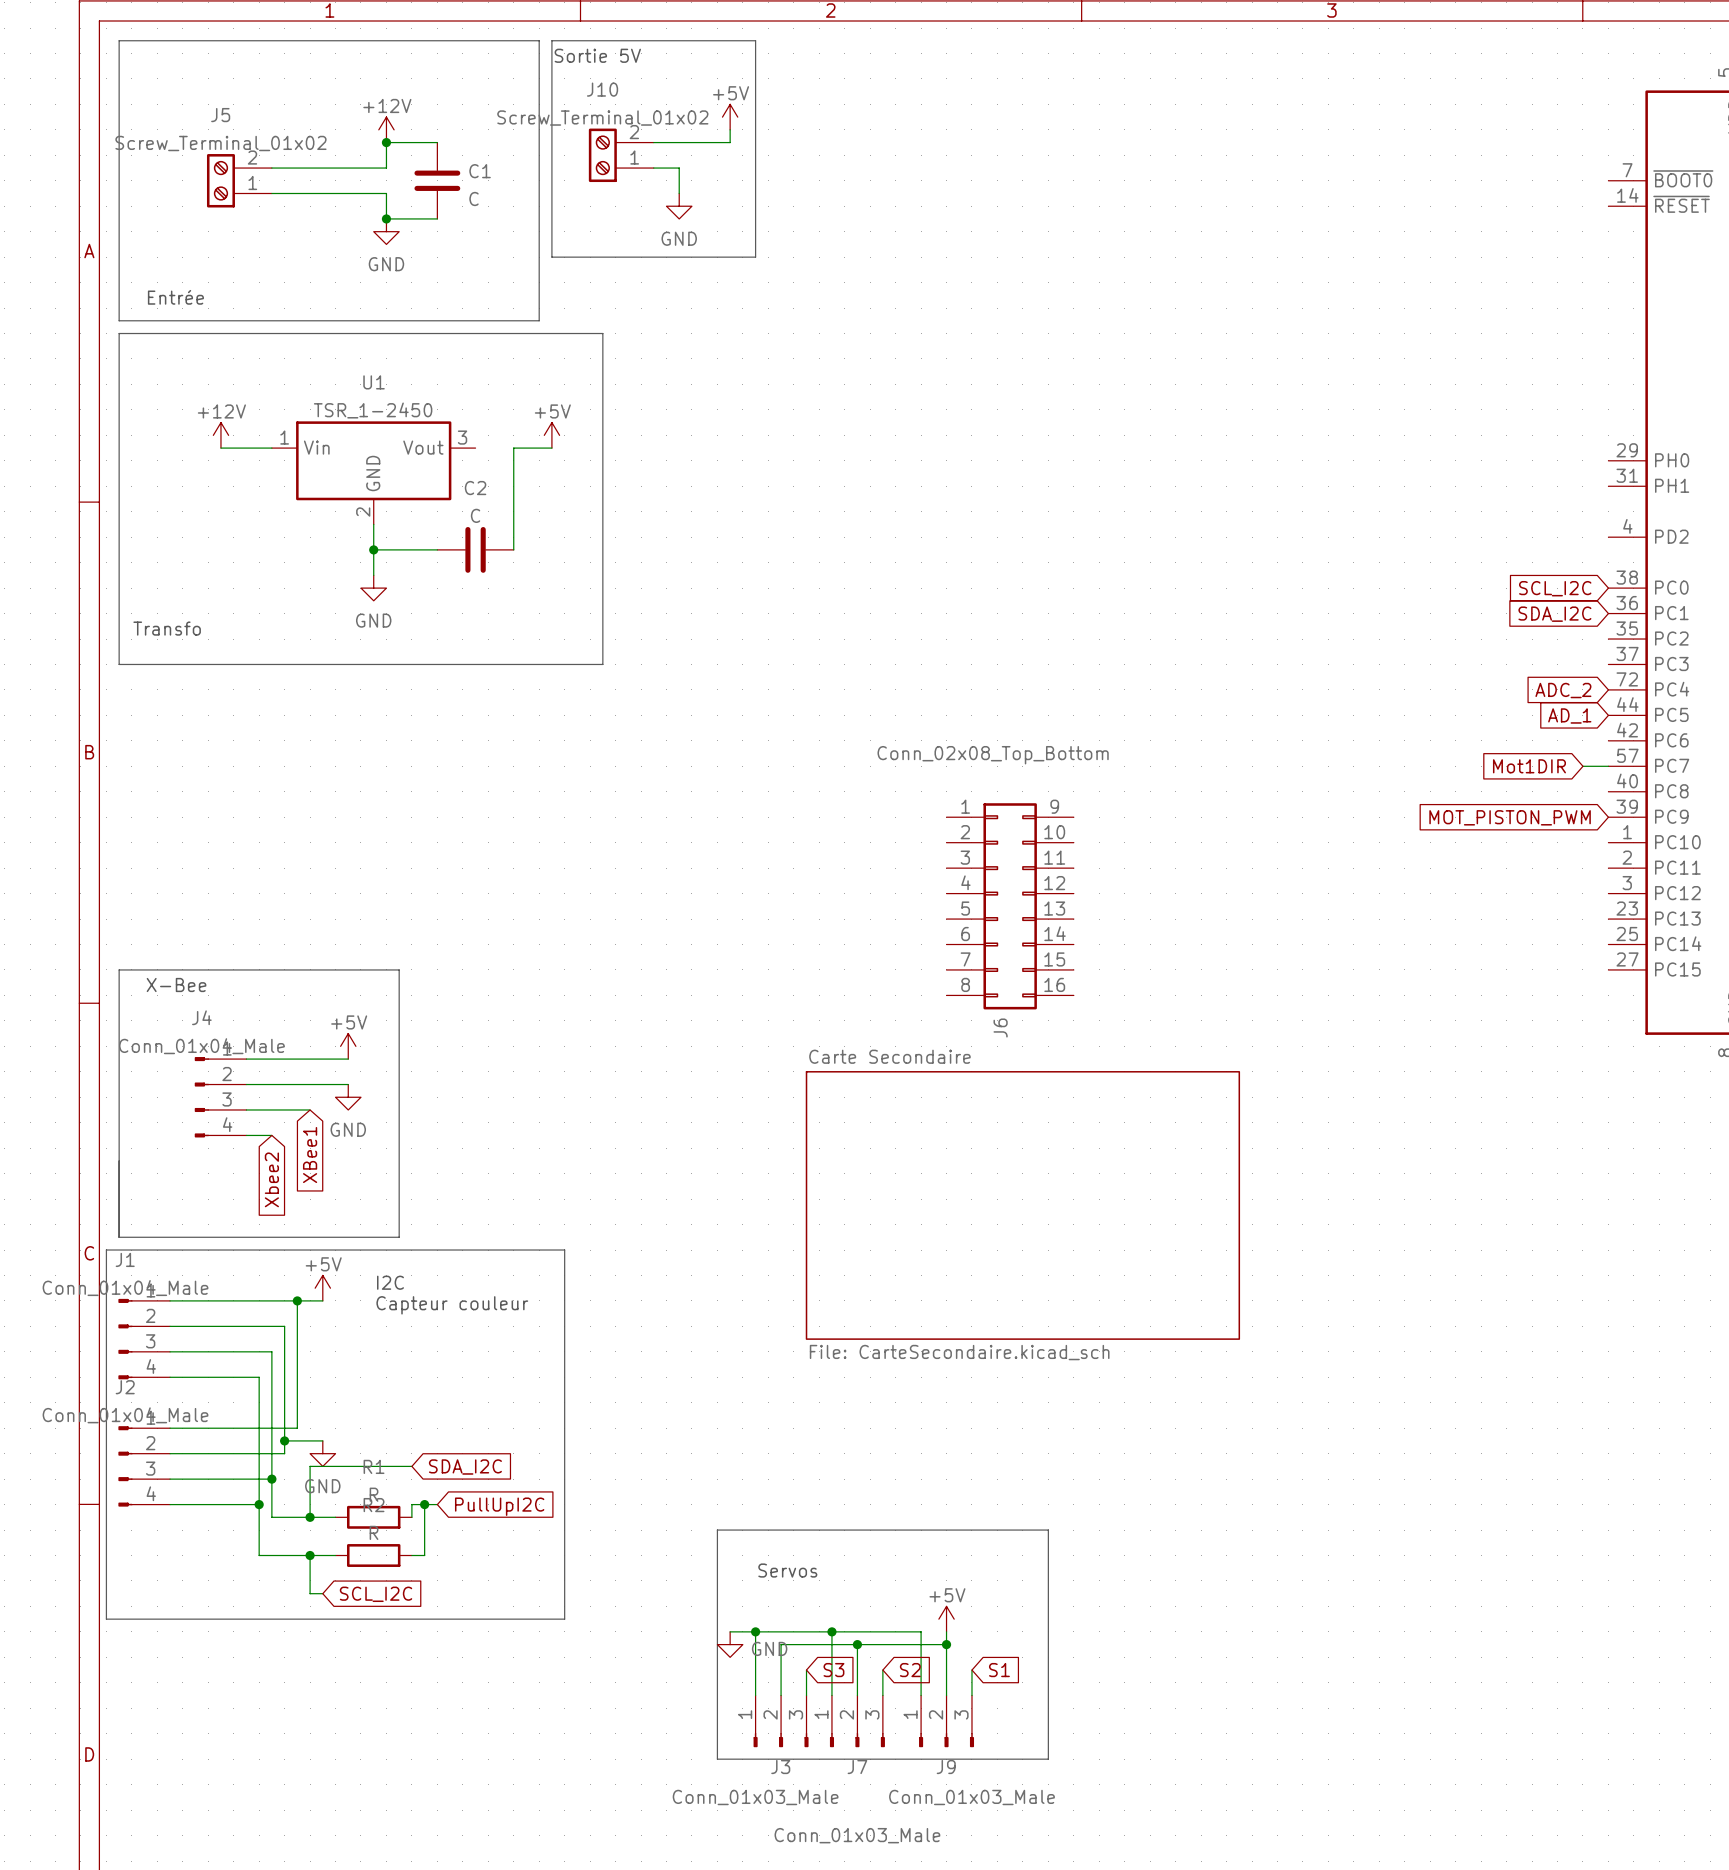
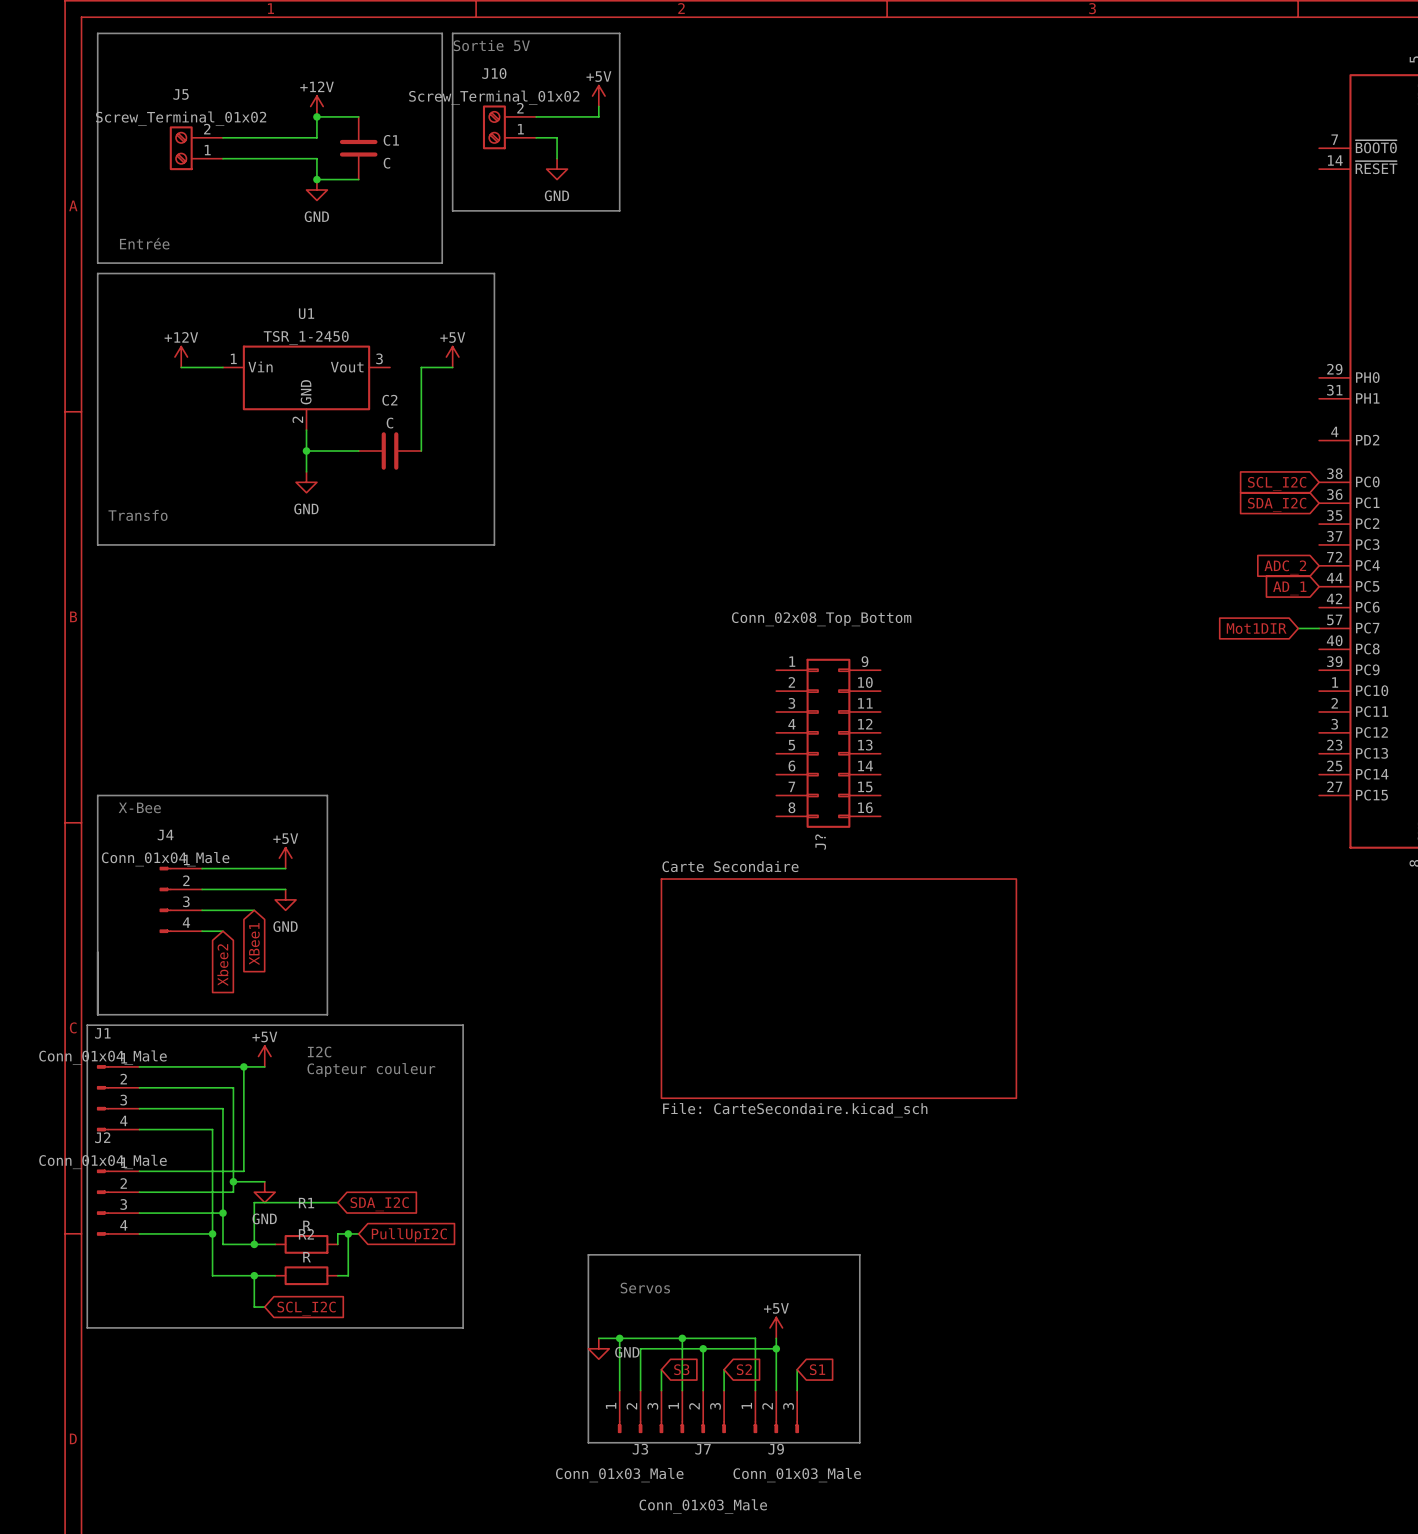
global label: MOT_PISTON_PWM (1510, 817) -> none
J6 name: J6 (1000, 1028) -> J? (820, 842)

